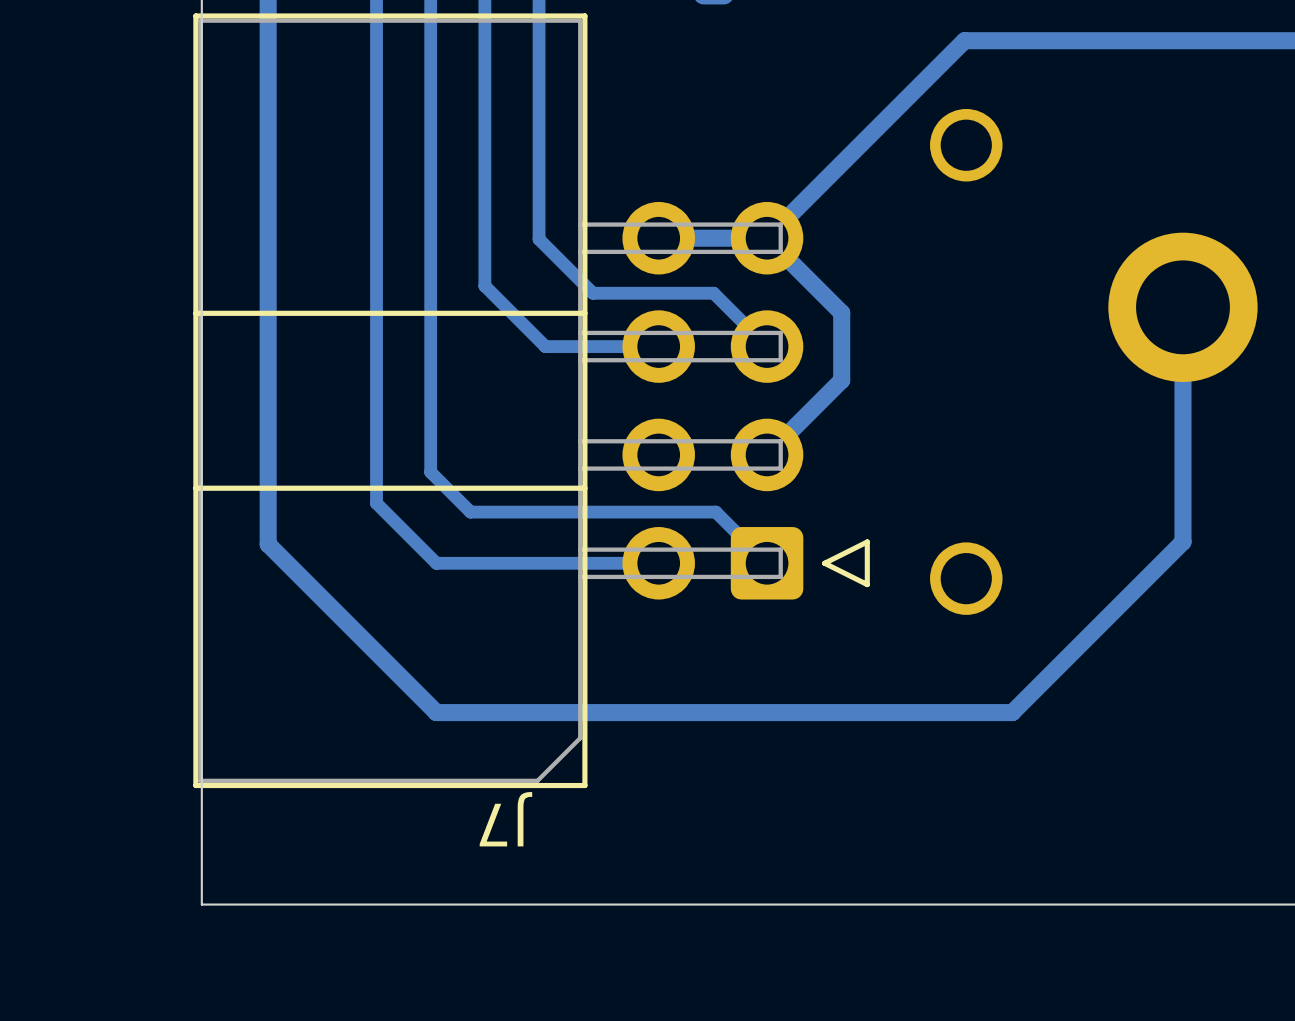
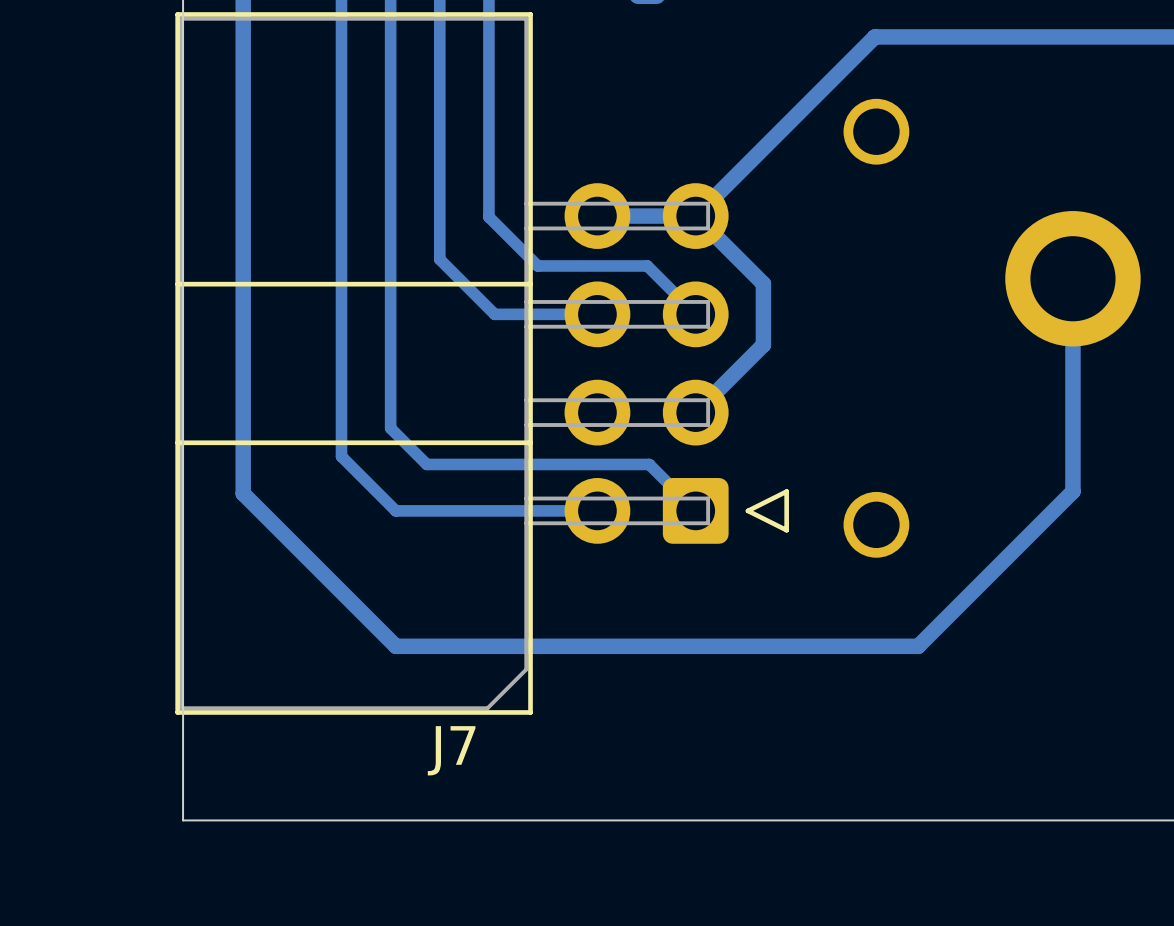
J7 name rotation: 0° (505, 819) -> 180° (451, 750)

